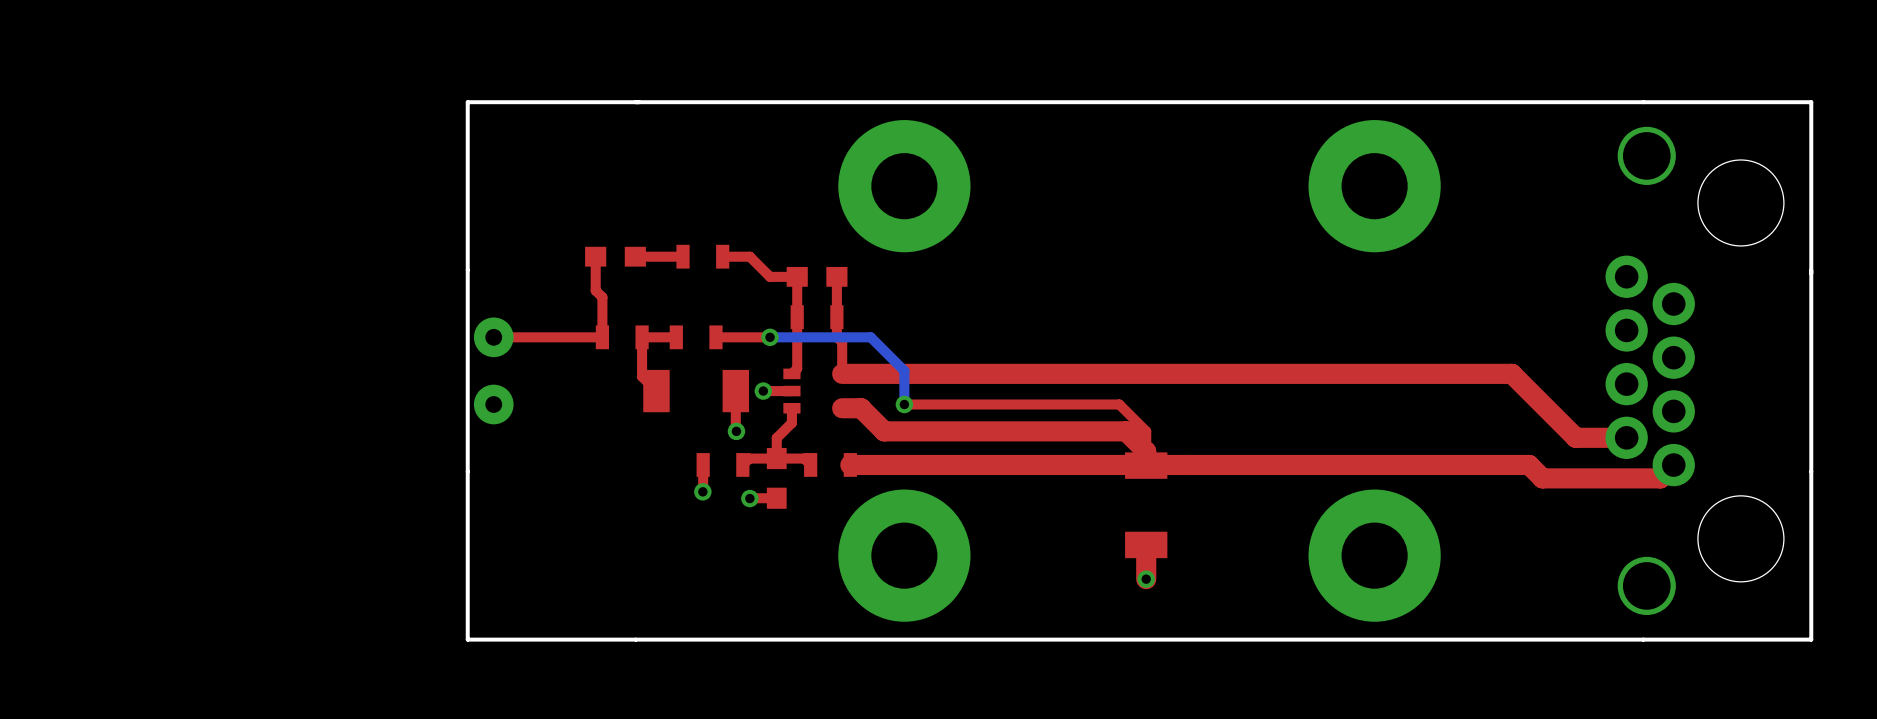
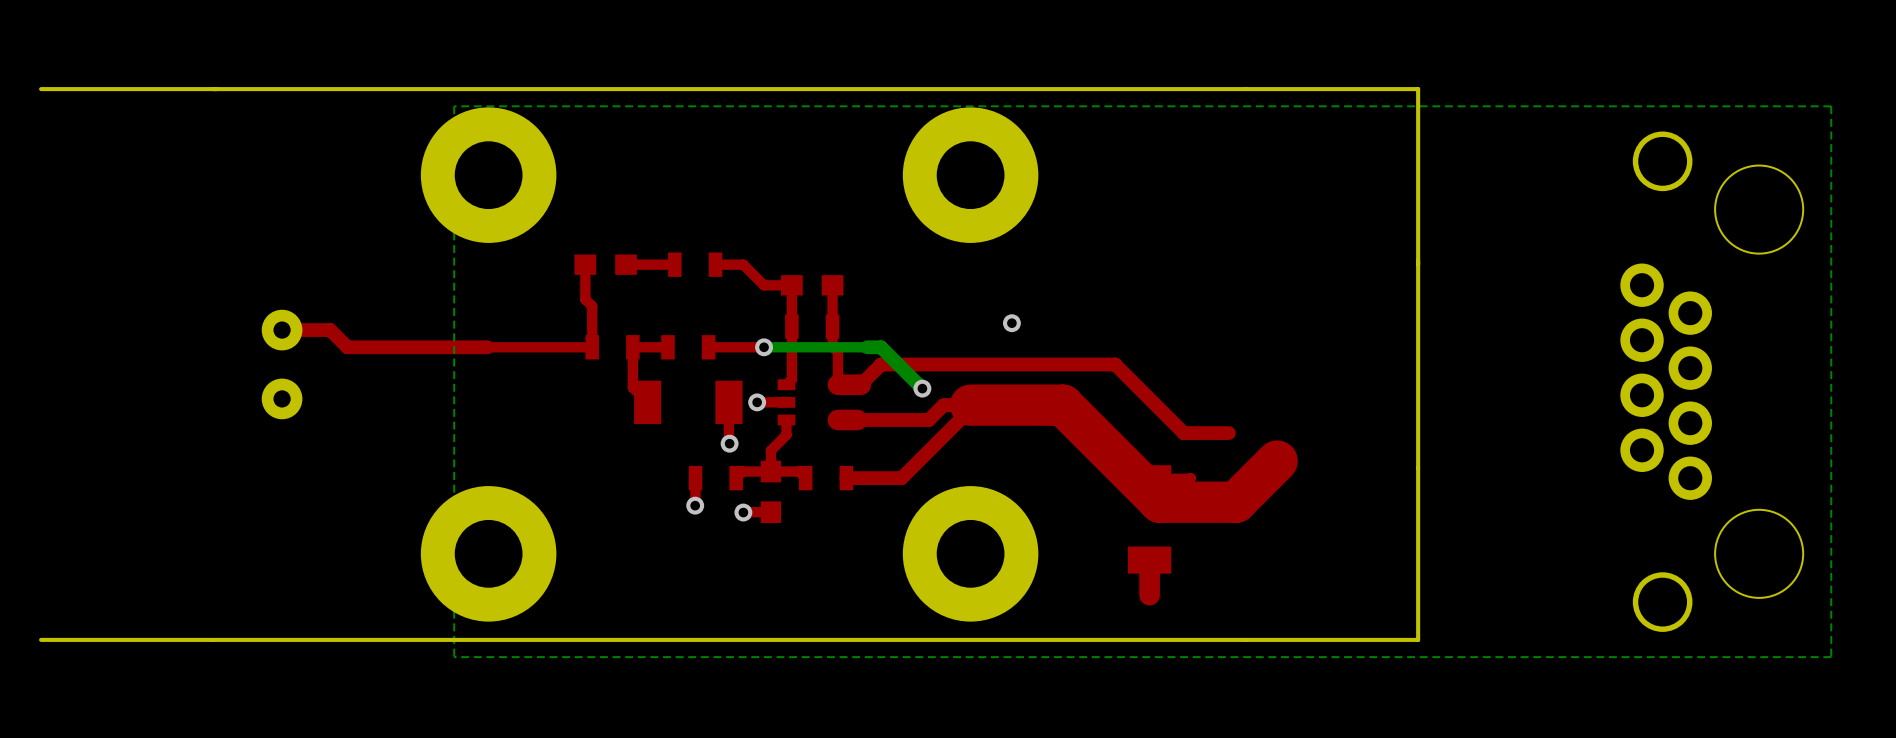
board edge: none -> (41, 89) (1418, 89) (1418, 639) (41, 639)
board edge: (1811, 102) (1811, 639) (467, 639) (467, 102) (1811, 102) -> none
part: none -> (488, 175)
part position: (904, 186) -> (970, 175)
part: (1374, 186) -> none
via: none -> (1011, 323)
top track: none -> (282, 330) (330, 330) (347, 347) (487, 347)
bottom track: (870, 337) (904, 370) (904, 404) -> (867, 347) (881, 347) (922, 388)
part position: (493, 370) -> (282, 364)
top track: (864, 373) (1511, 373) (1575, 437) (1626, 437) -> (860, 384) (881, 364) (1115, 364) (1183, 433) (1228, 433)
top track: none -> (970, 405) (1062, 405) (1159, 502) (1235, 502) (1277, 461)
top track: (904, 404) (1119, 404) (1146, 431) (1146, 465) (1146, 451) (1126, 431) (884, 431) (861, 408) -> (970, 405) (943, 405) (928, 419) (857, 419)
via position: (904, 404) -> (922, 388)
top track width: thick (904, 464) (850, 464) -> thin (901, 478) (846, 478)
top track: (1673, 465) (1660, 478) (1542, 478) (1529, 464) (904, 464) -> (970, 405) (970, 409) (901, 478)
part: none -> (488, 553)
part position: (904, 555) -> (970, 553)
part: (1374, 555) -> none
via: (1146, 579) -> none

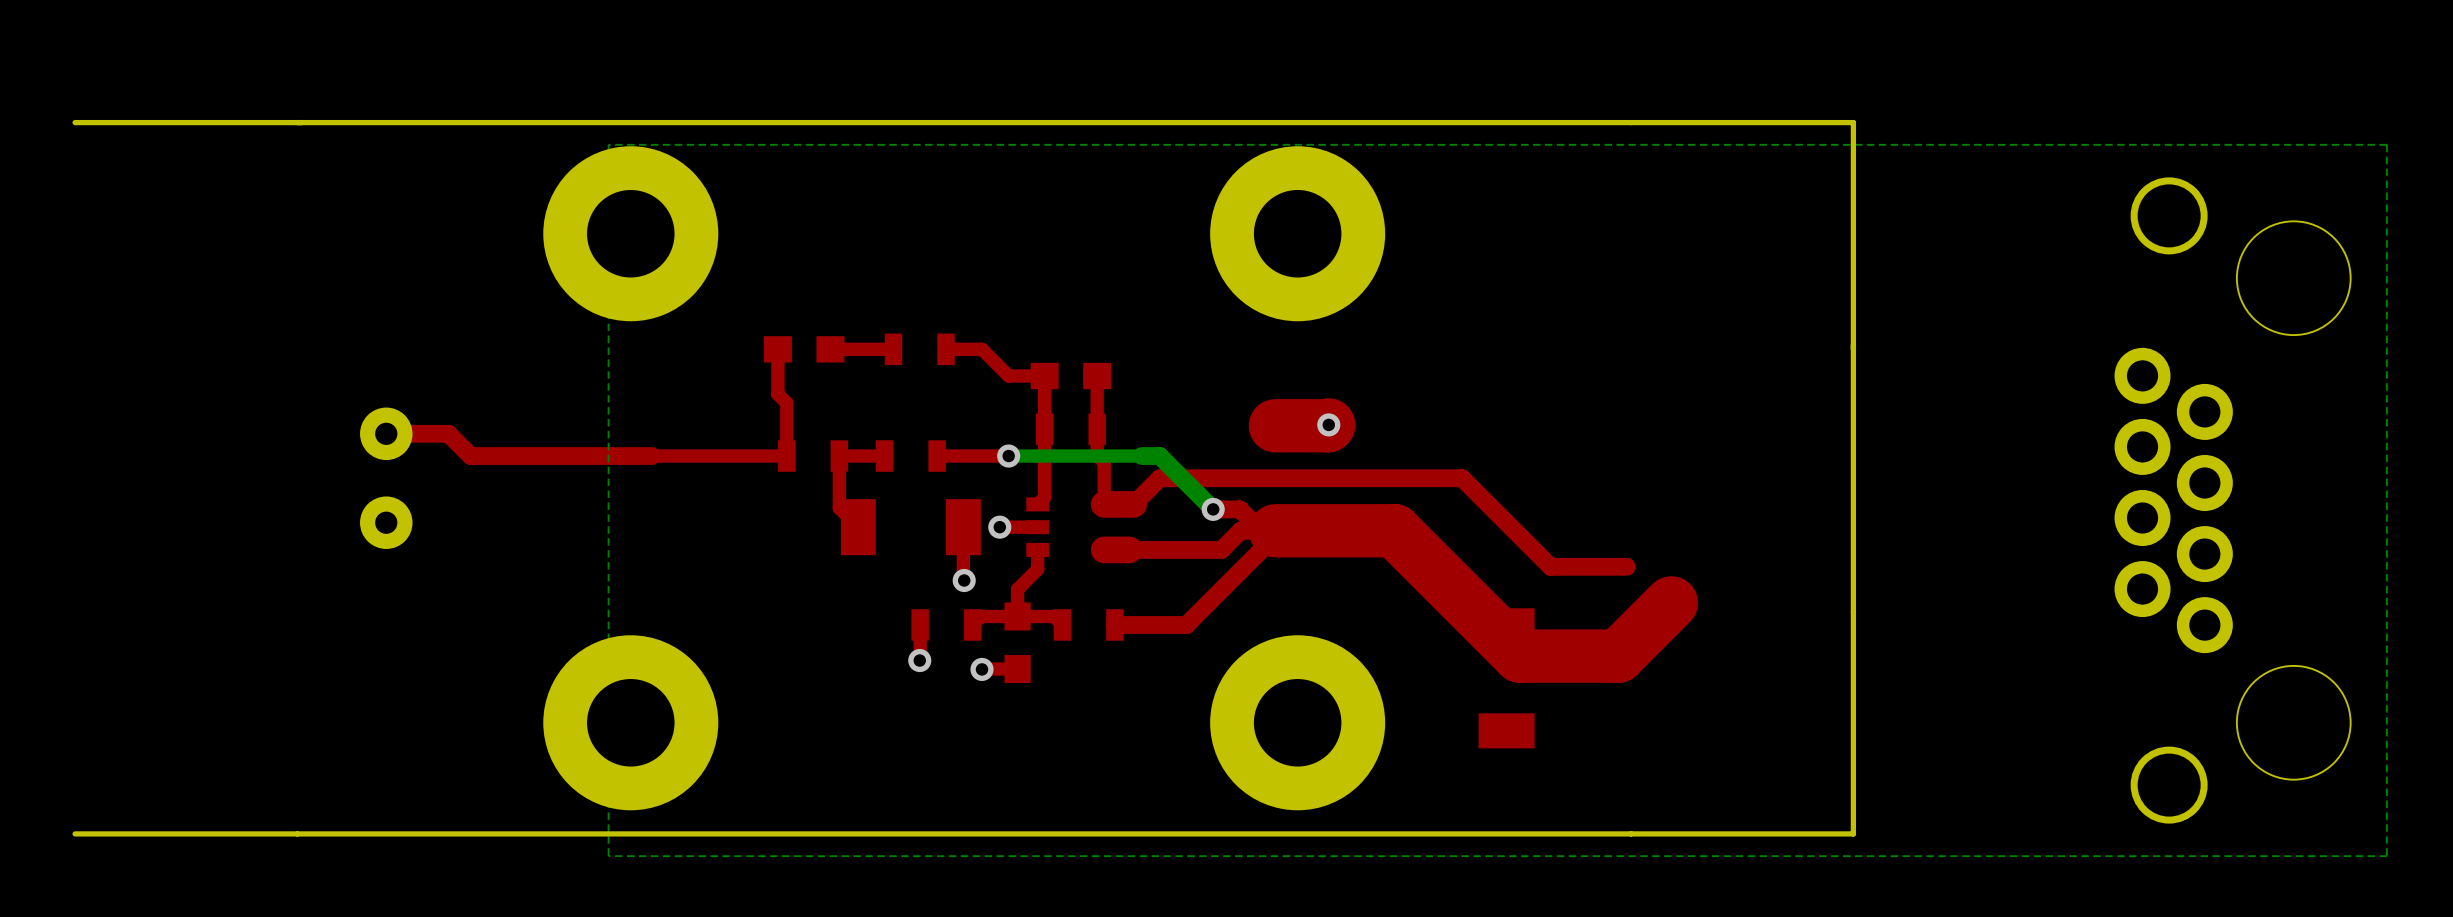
part position: (488, 175) -> (630, 233)
part position: (970, 175) -> (1297, 233)
top track: none -> (1213, 509) (1239, 509) (1261, 530)
top track: none -> (1626, 566) (1609, 566)
top track: (1190, 478) (1149, 478) -> (1328, 424) (1275, 425)
part position: (488, 553) -> (630, 722)
part position: (970, 553) -> (1297, 722)
top track: (1149, 560) (1149, 595) -> none

